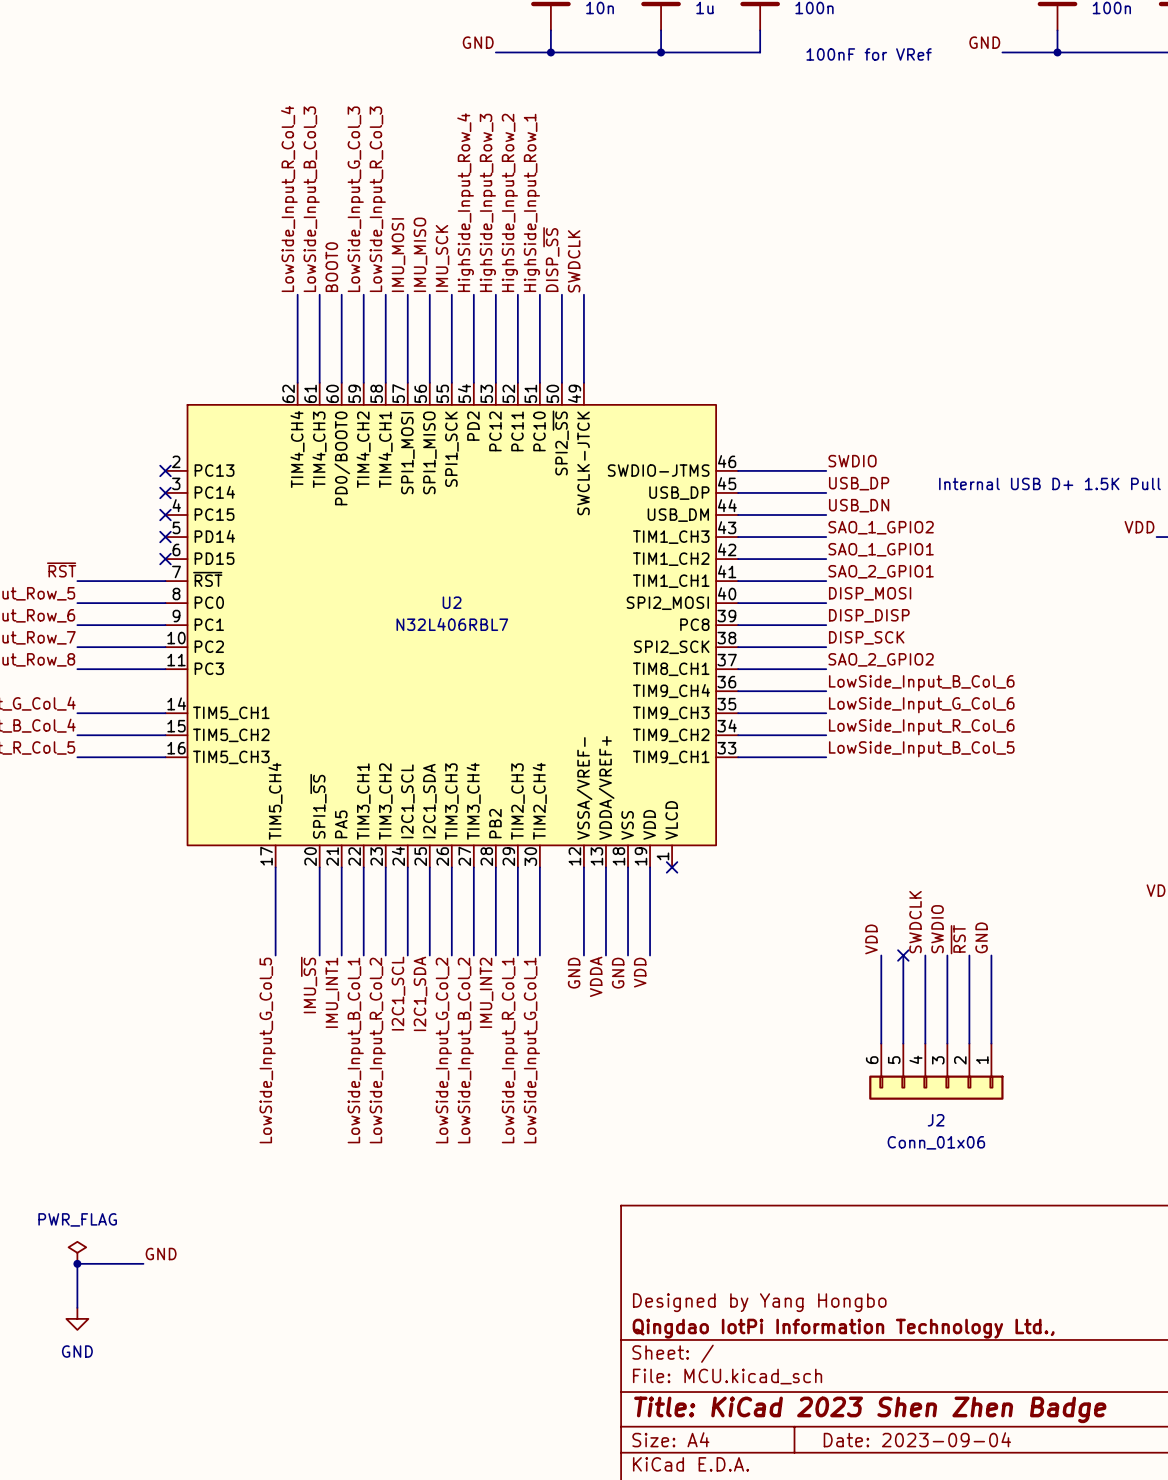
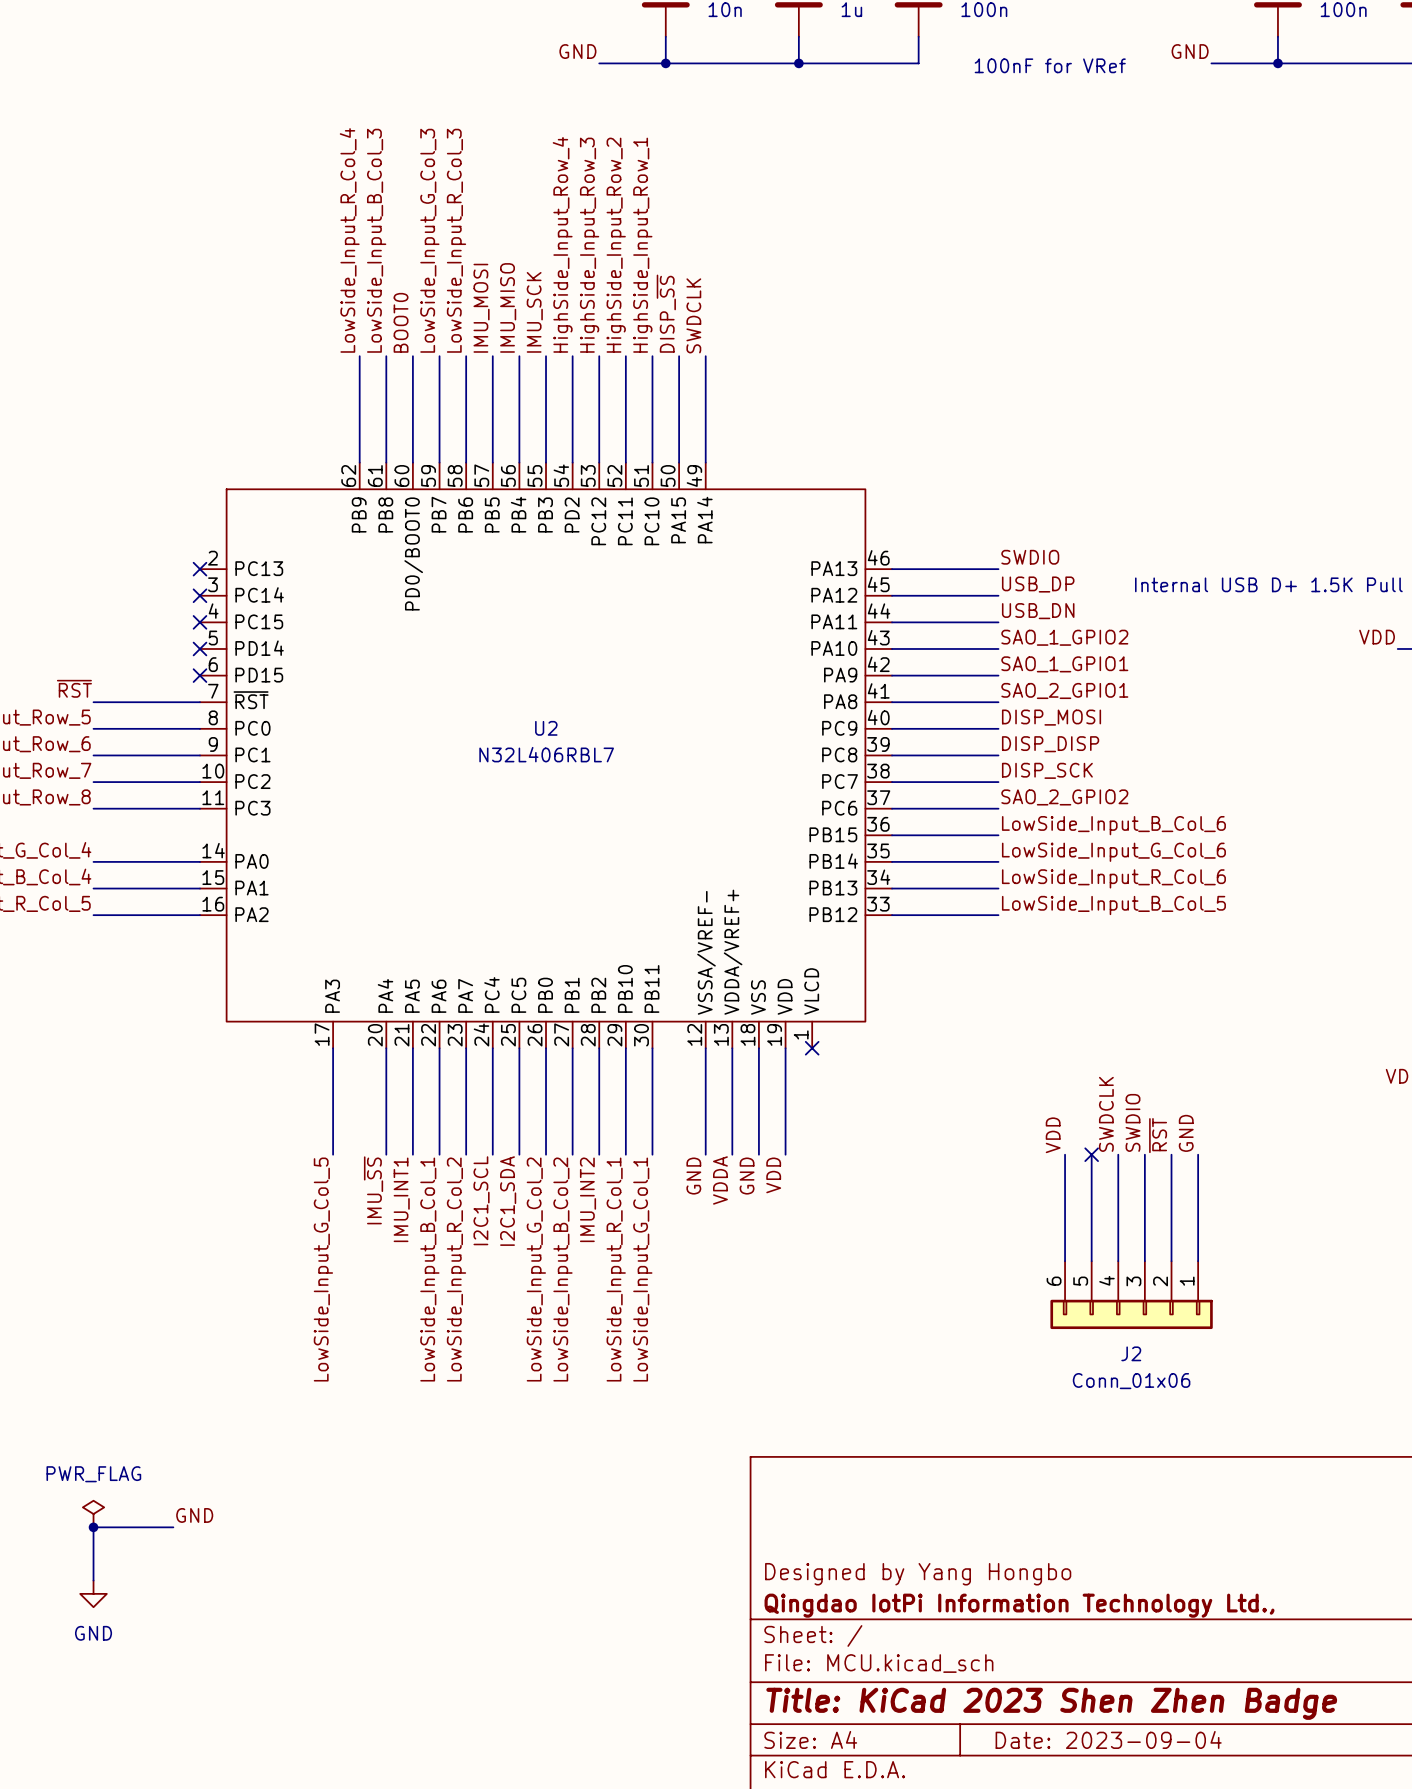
U2 symbol: [165, 382, 739, 868] -> [199, 462, 893, 1049]

